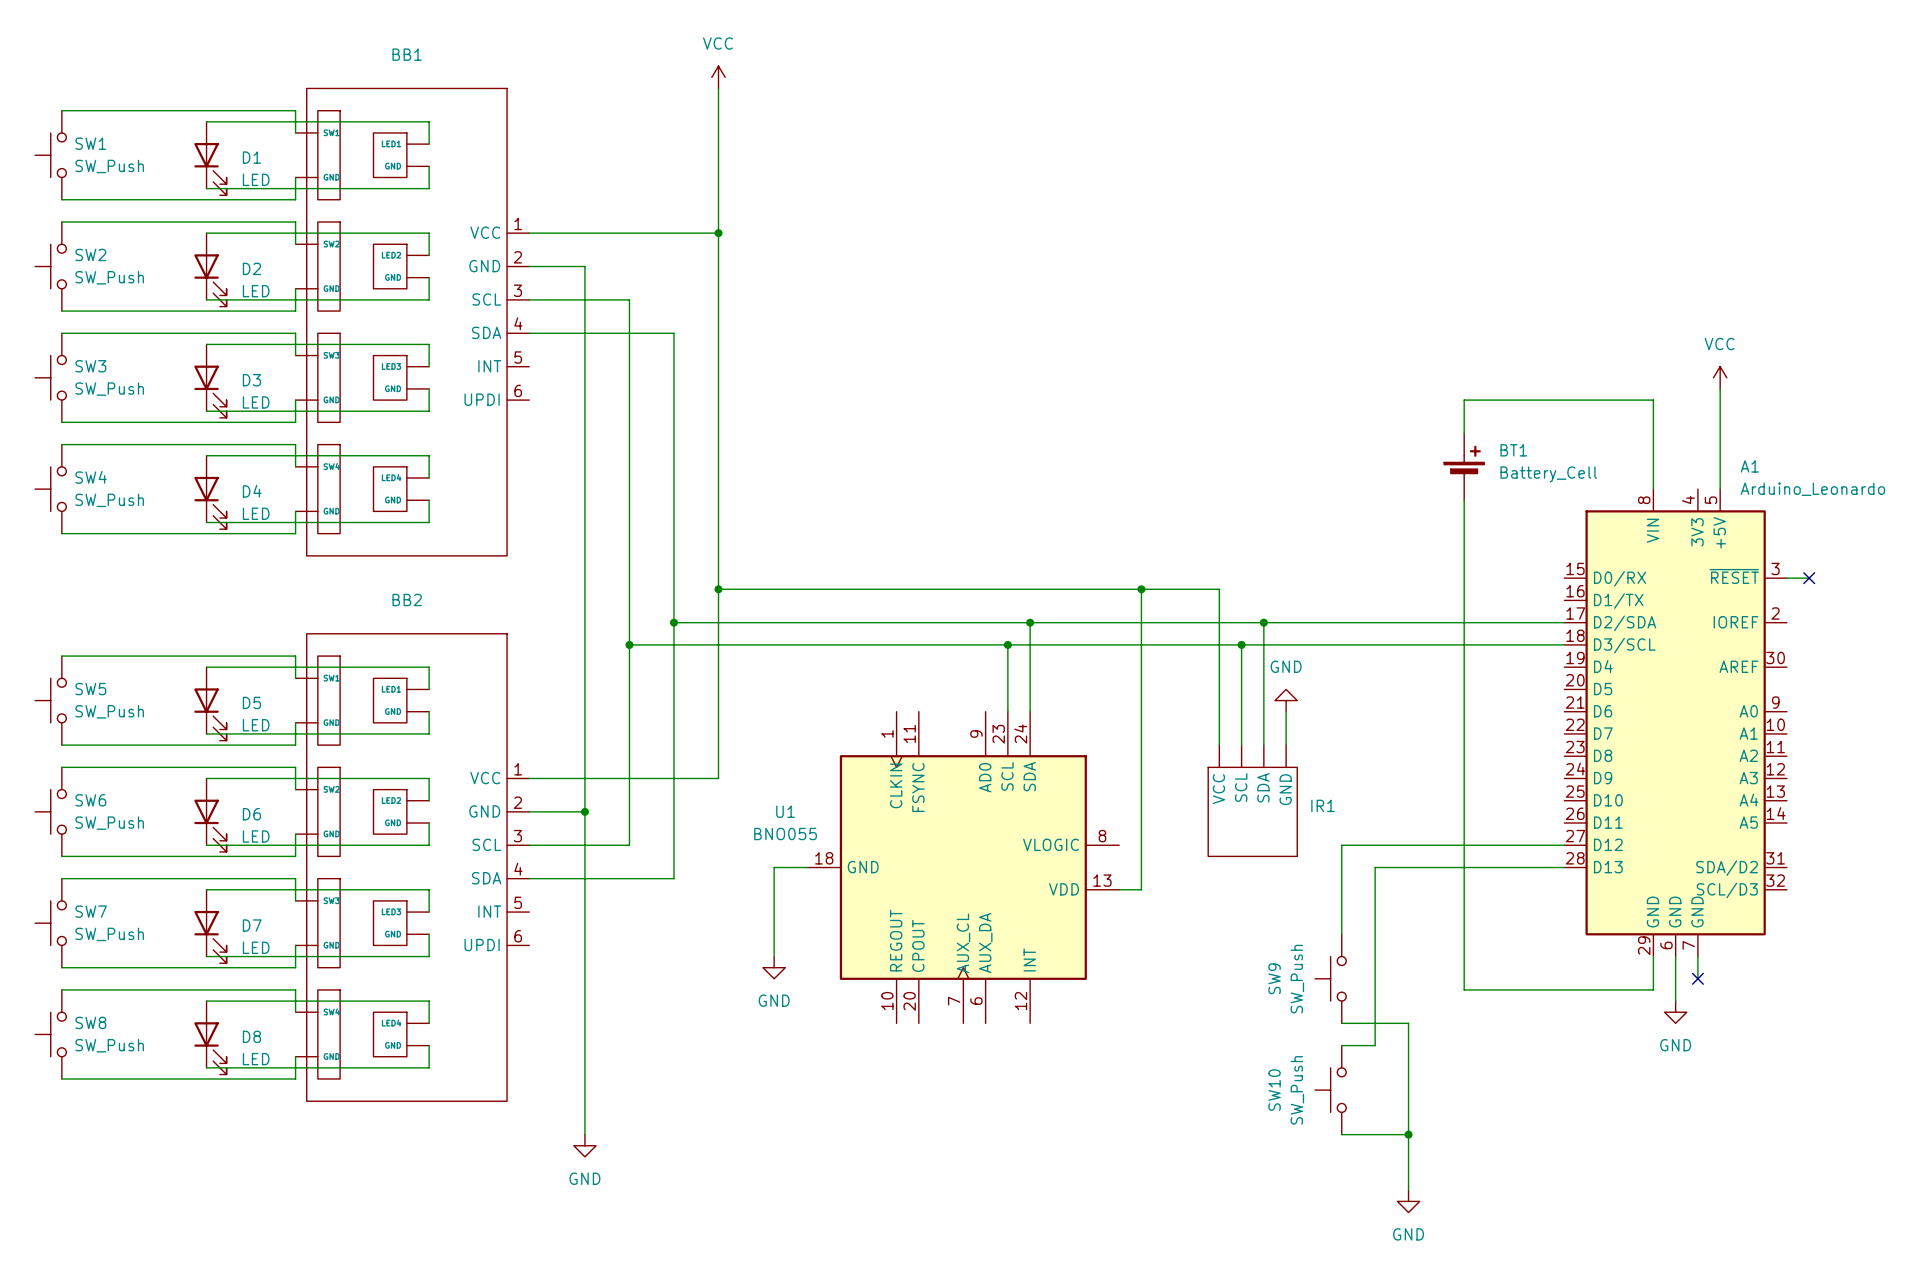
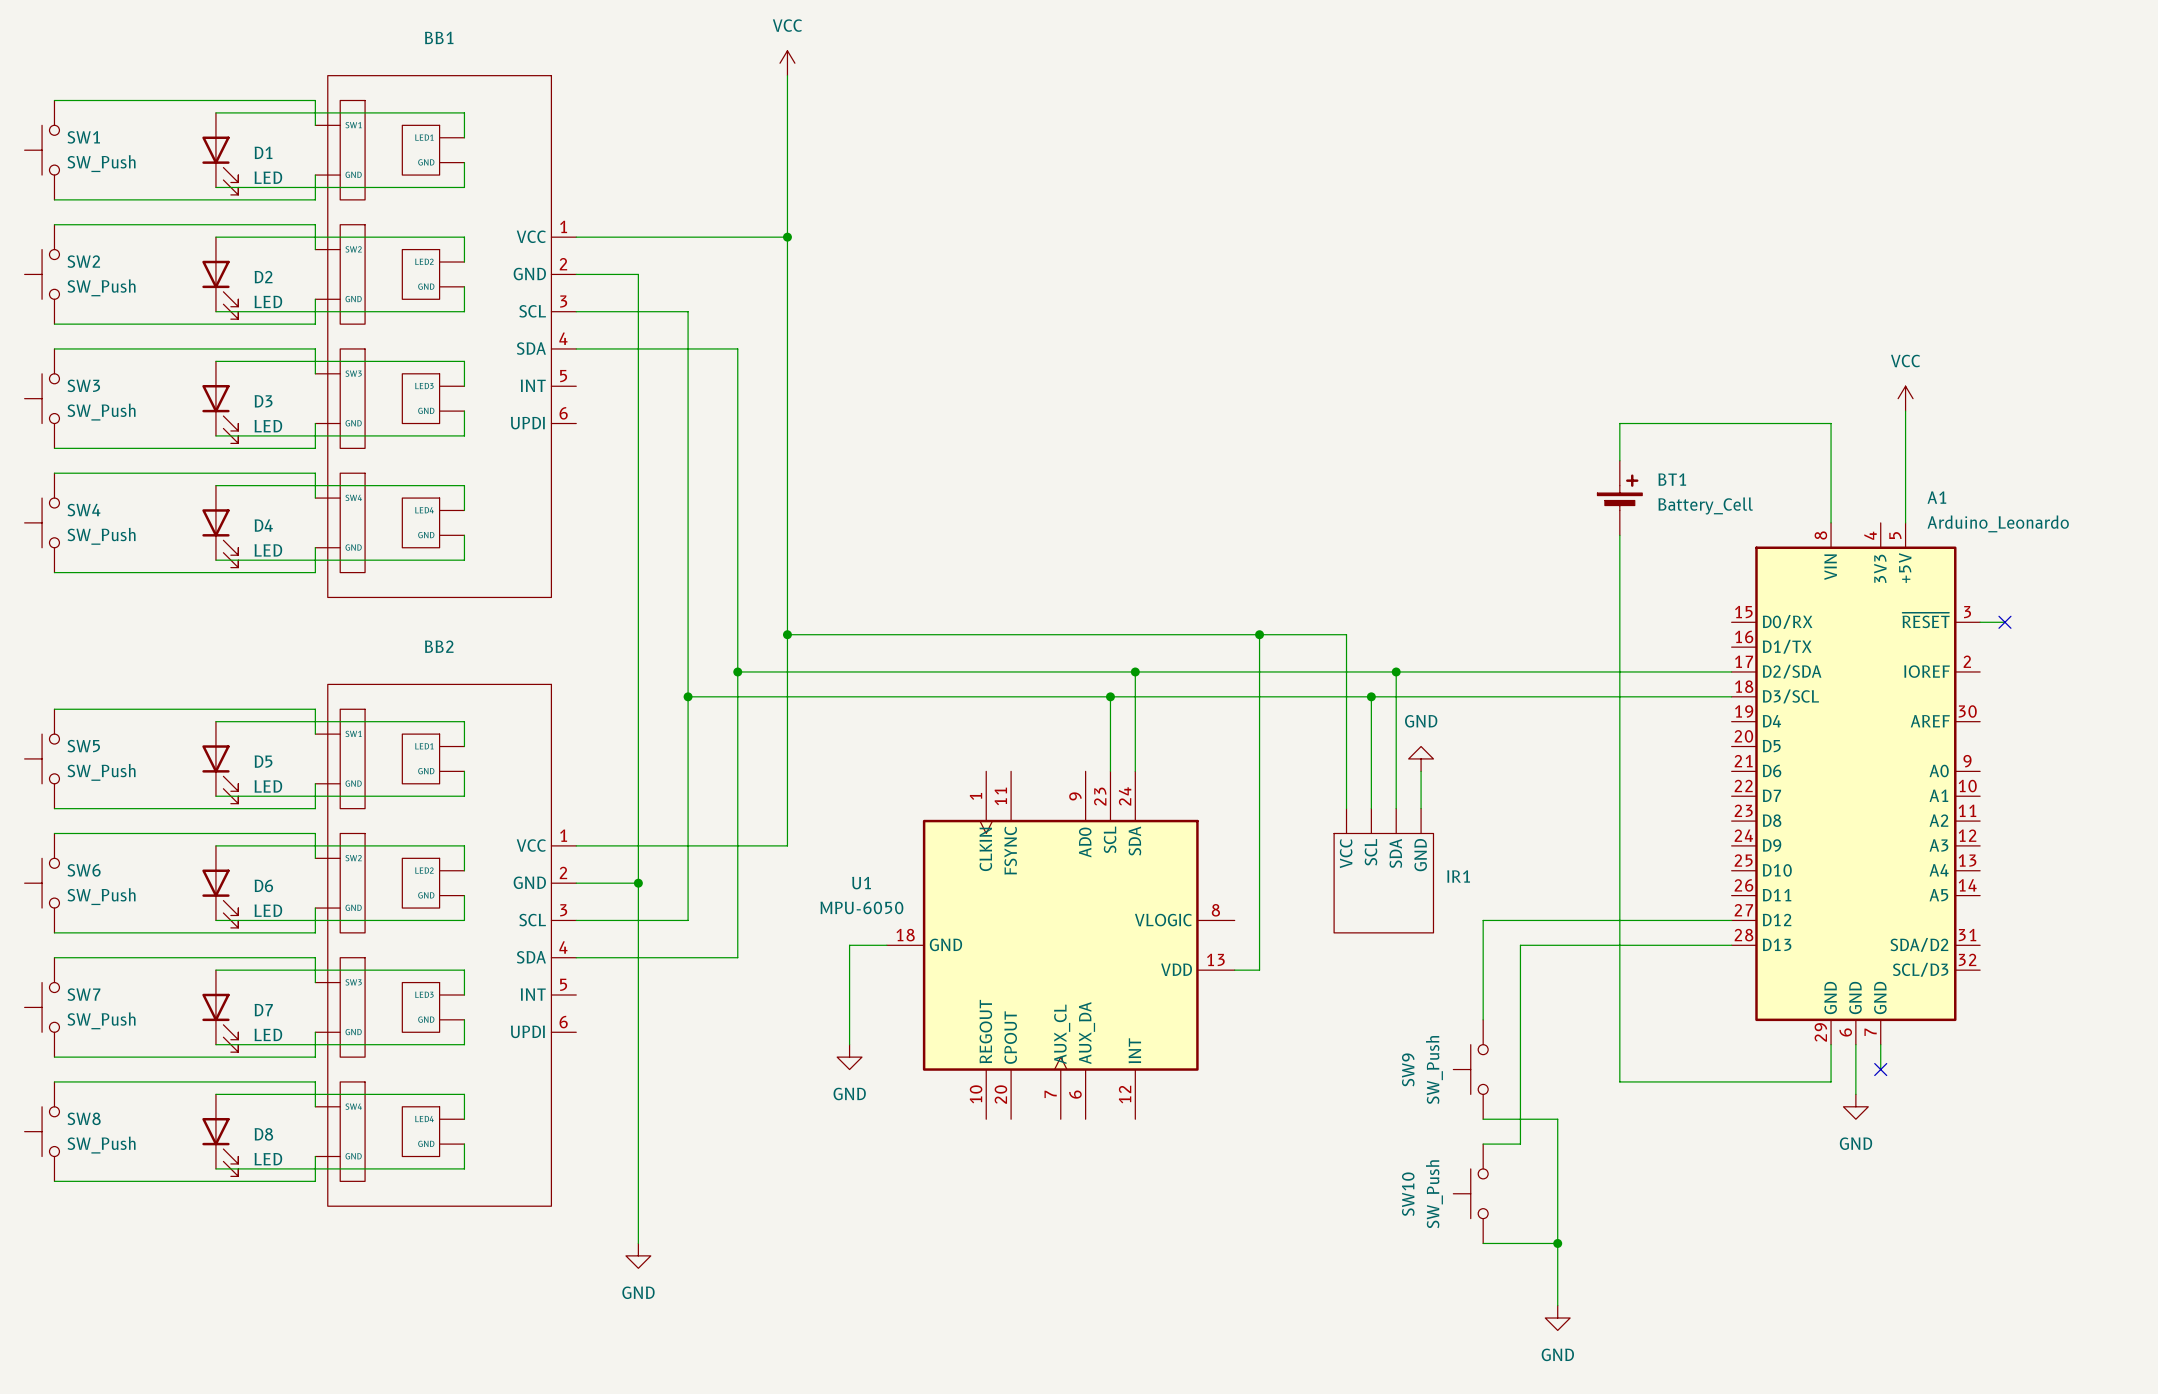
U1 value: BNO055 (785, 833) -> MPU-6050 (861, 907)

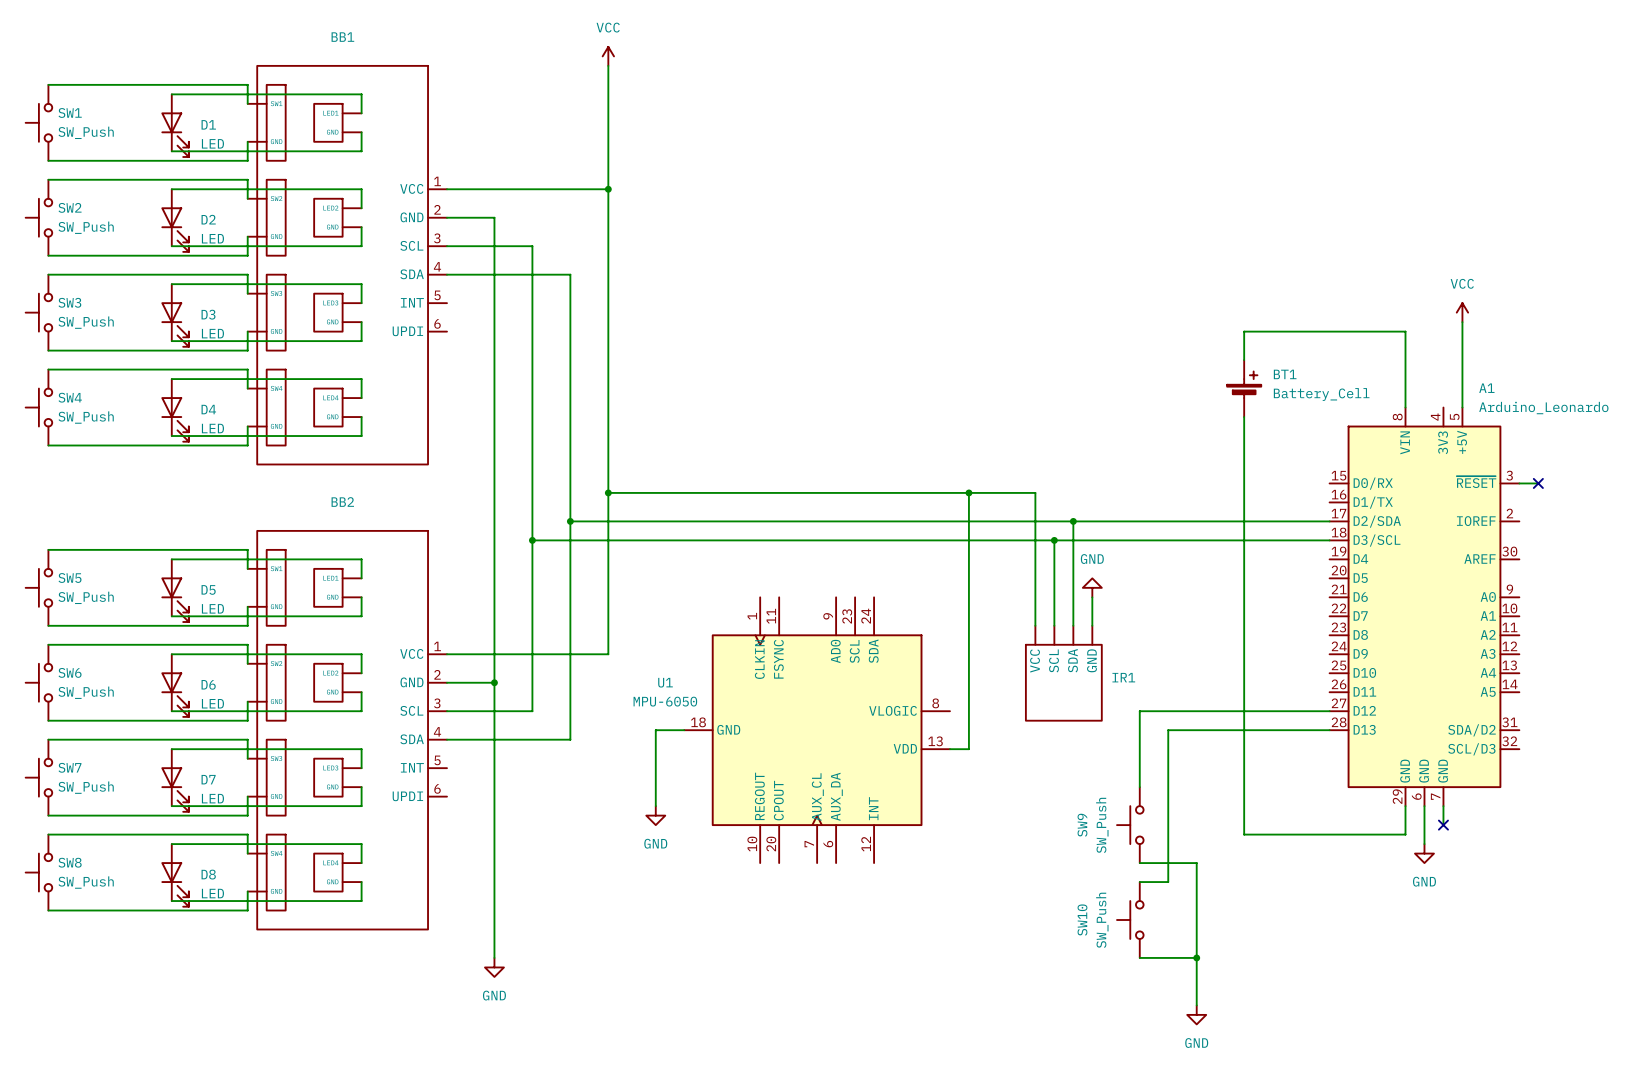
wire: (1135, 671) (1135, 771) -> none
junction: (1135, 671) -> none
wire: (1110, 696) (1110, 771) -> none
junction: (1110, 696) -> none

